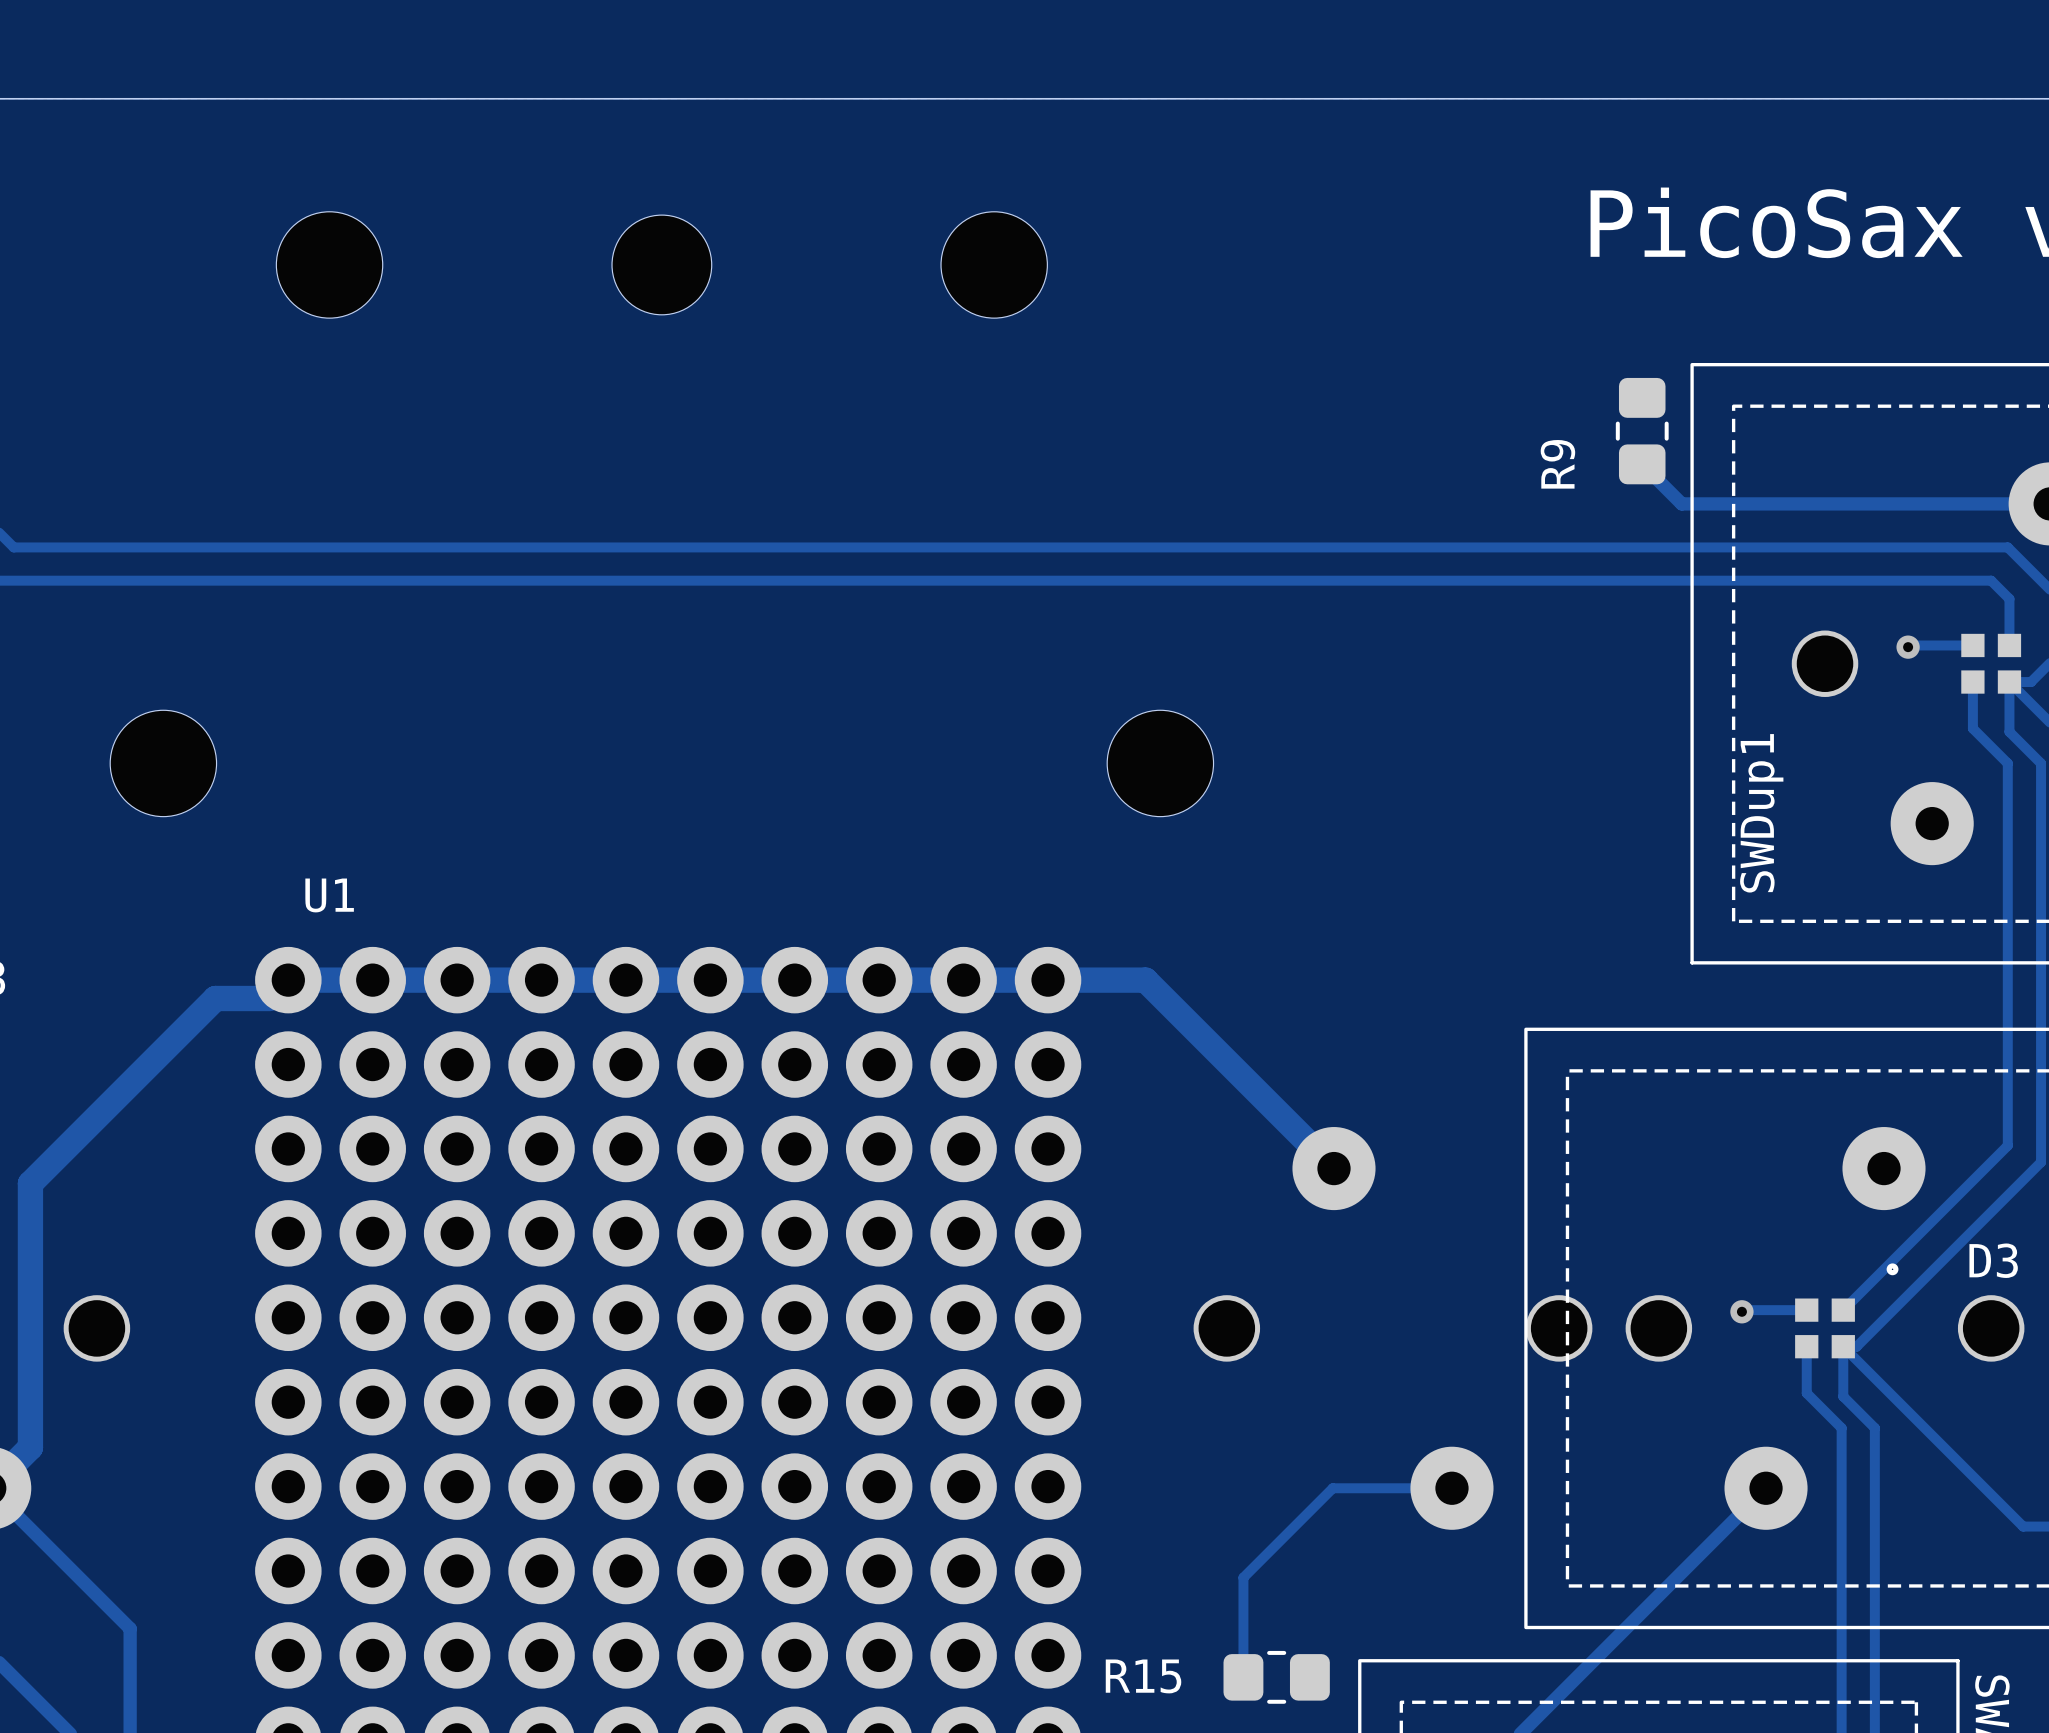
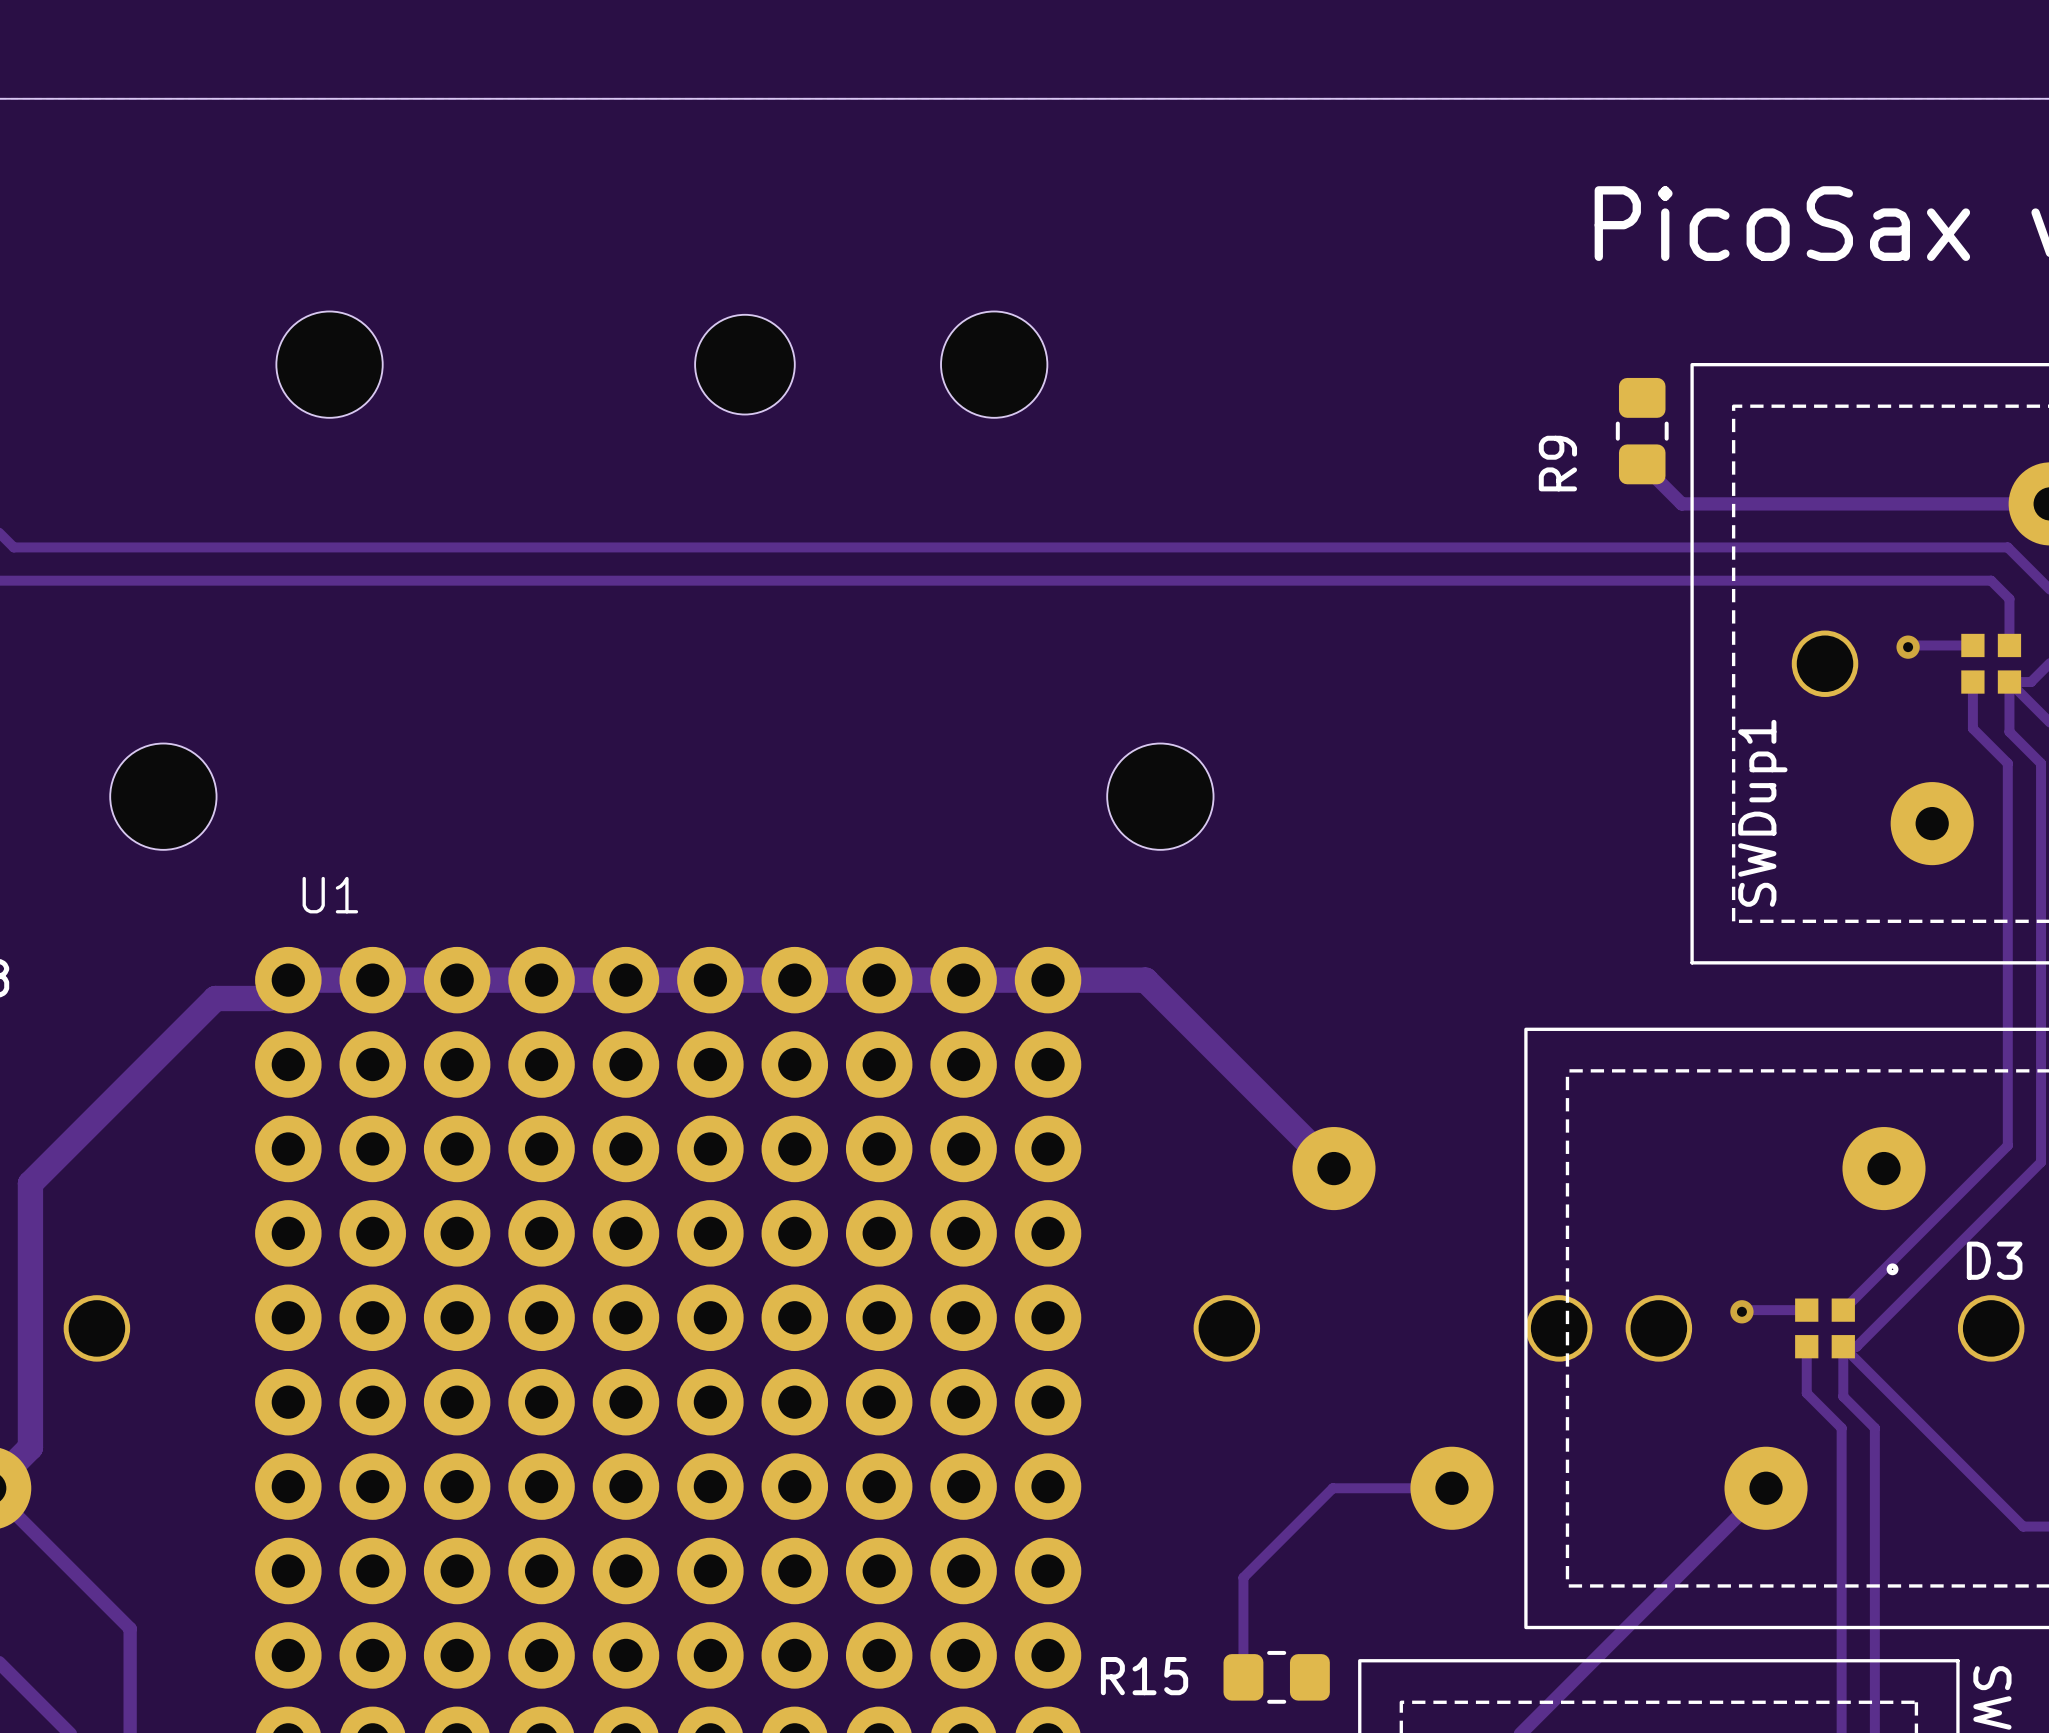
part position: (329, 264) -> (329, 364)
part position: (661, 264) -> (744, 364)
part position: (994, 264) -> (994, 364)
part position: (163, 763) -> (163, 796)
part position: (1160, 763) -> (1160, 796)

